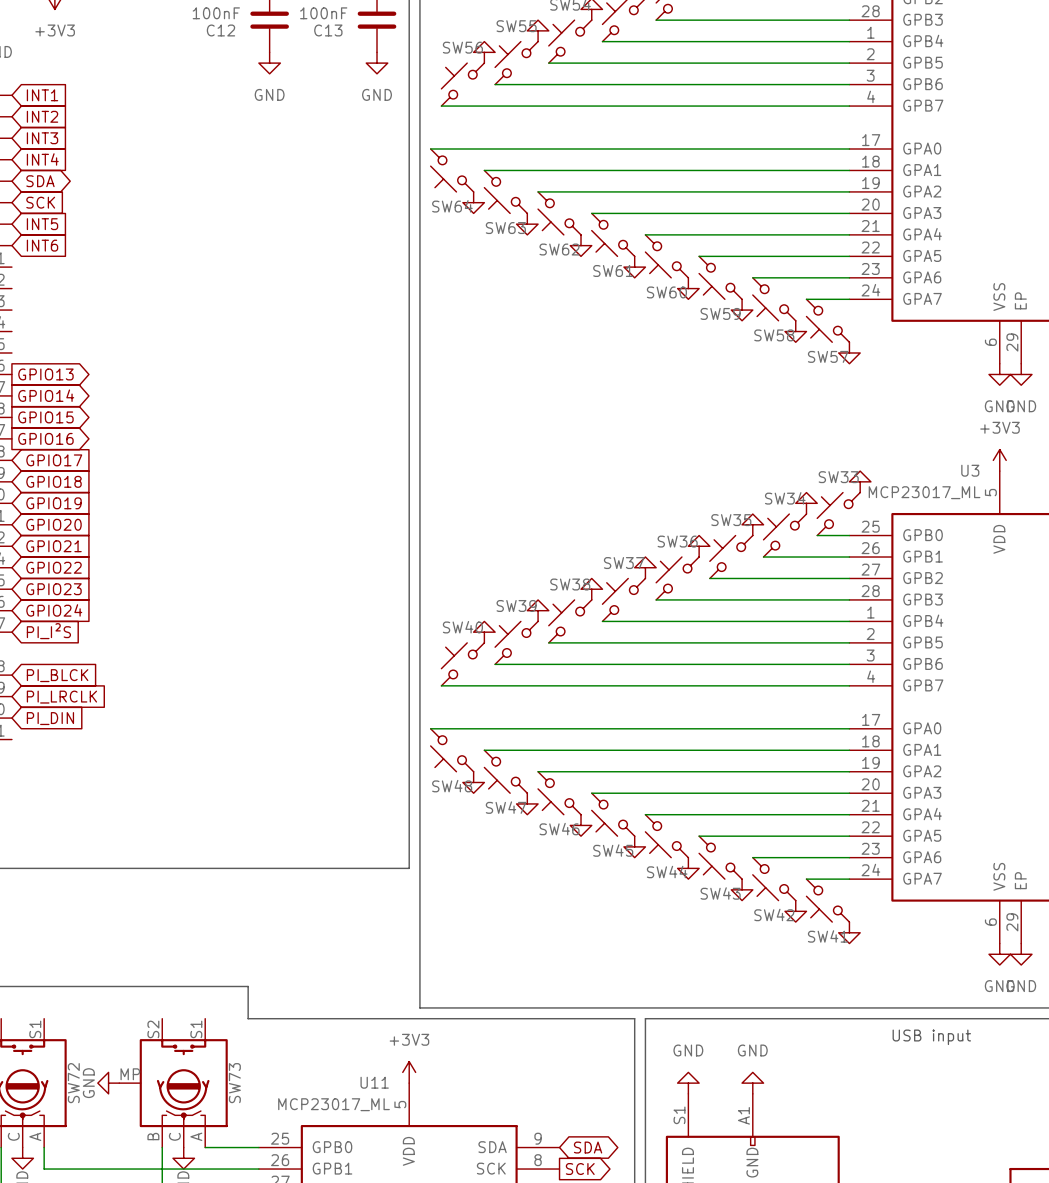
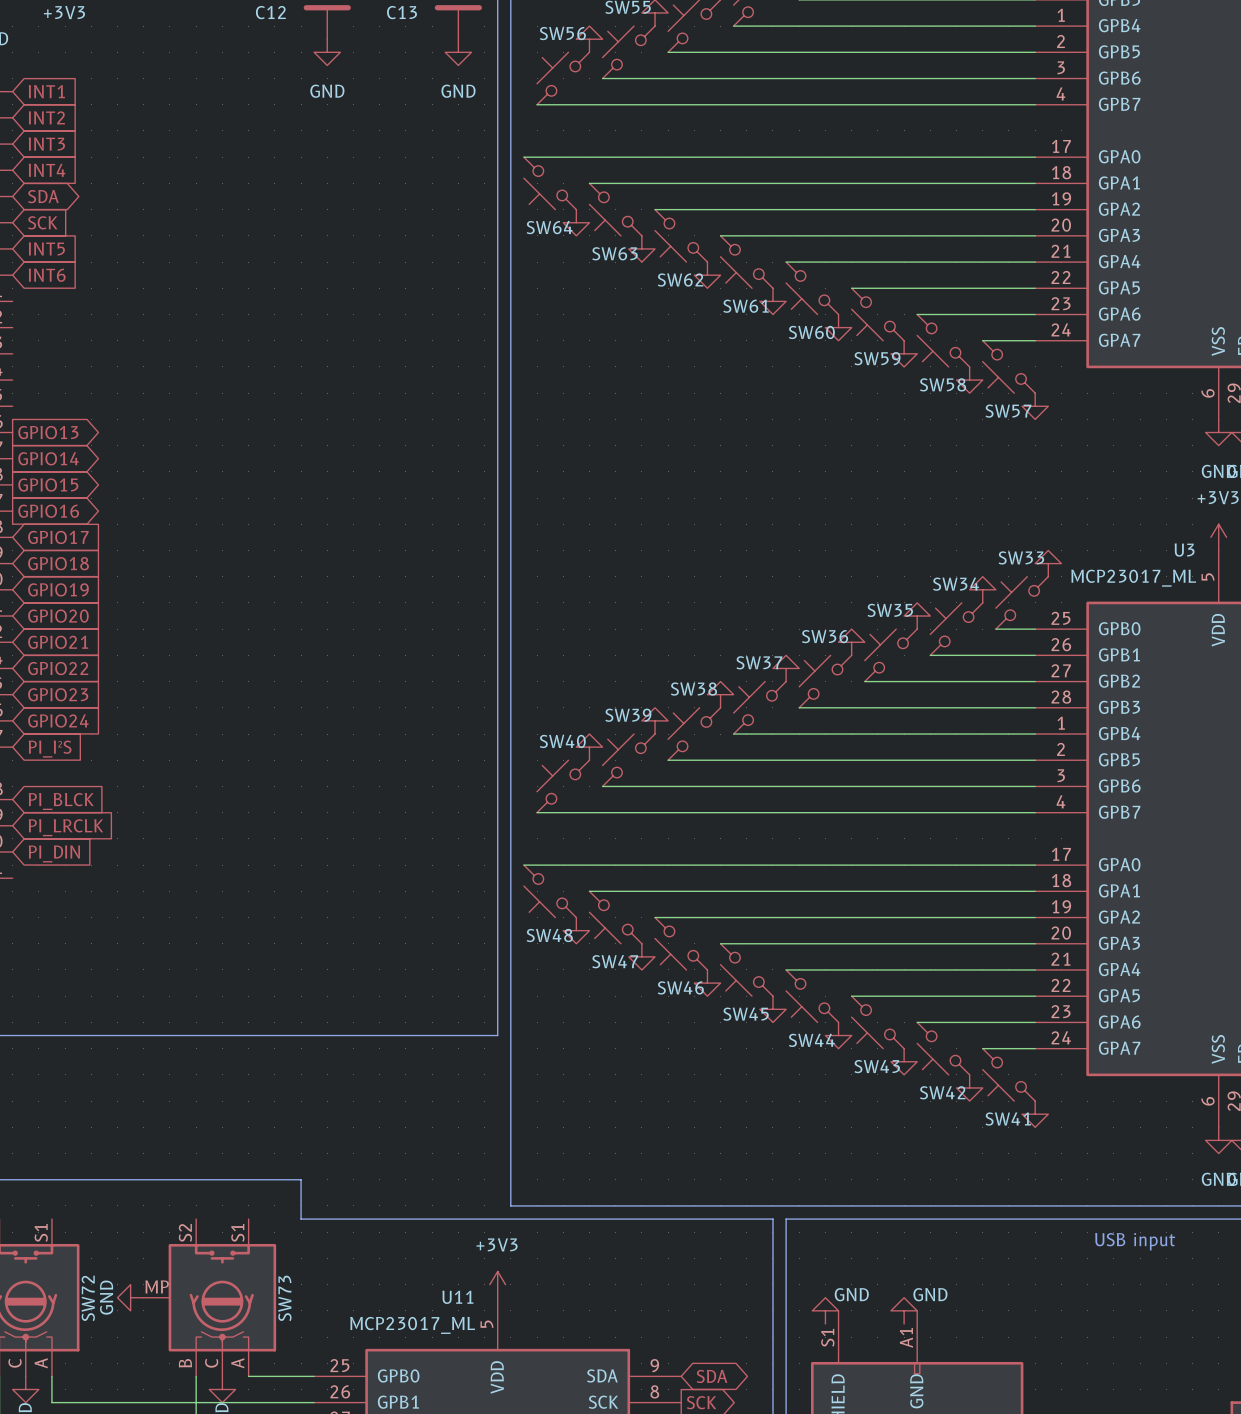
power symbol text position: GND (688, 1050) -> GND (851, 1294)
power symbol text position: GND (752, 1050) -> GND (930, 1294)
power symbol position: GND (688, 1083) -> GND (825, 1310)
power symbol position: GND (752, 1083) -> GND (904, 1310)

